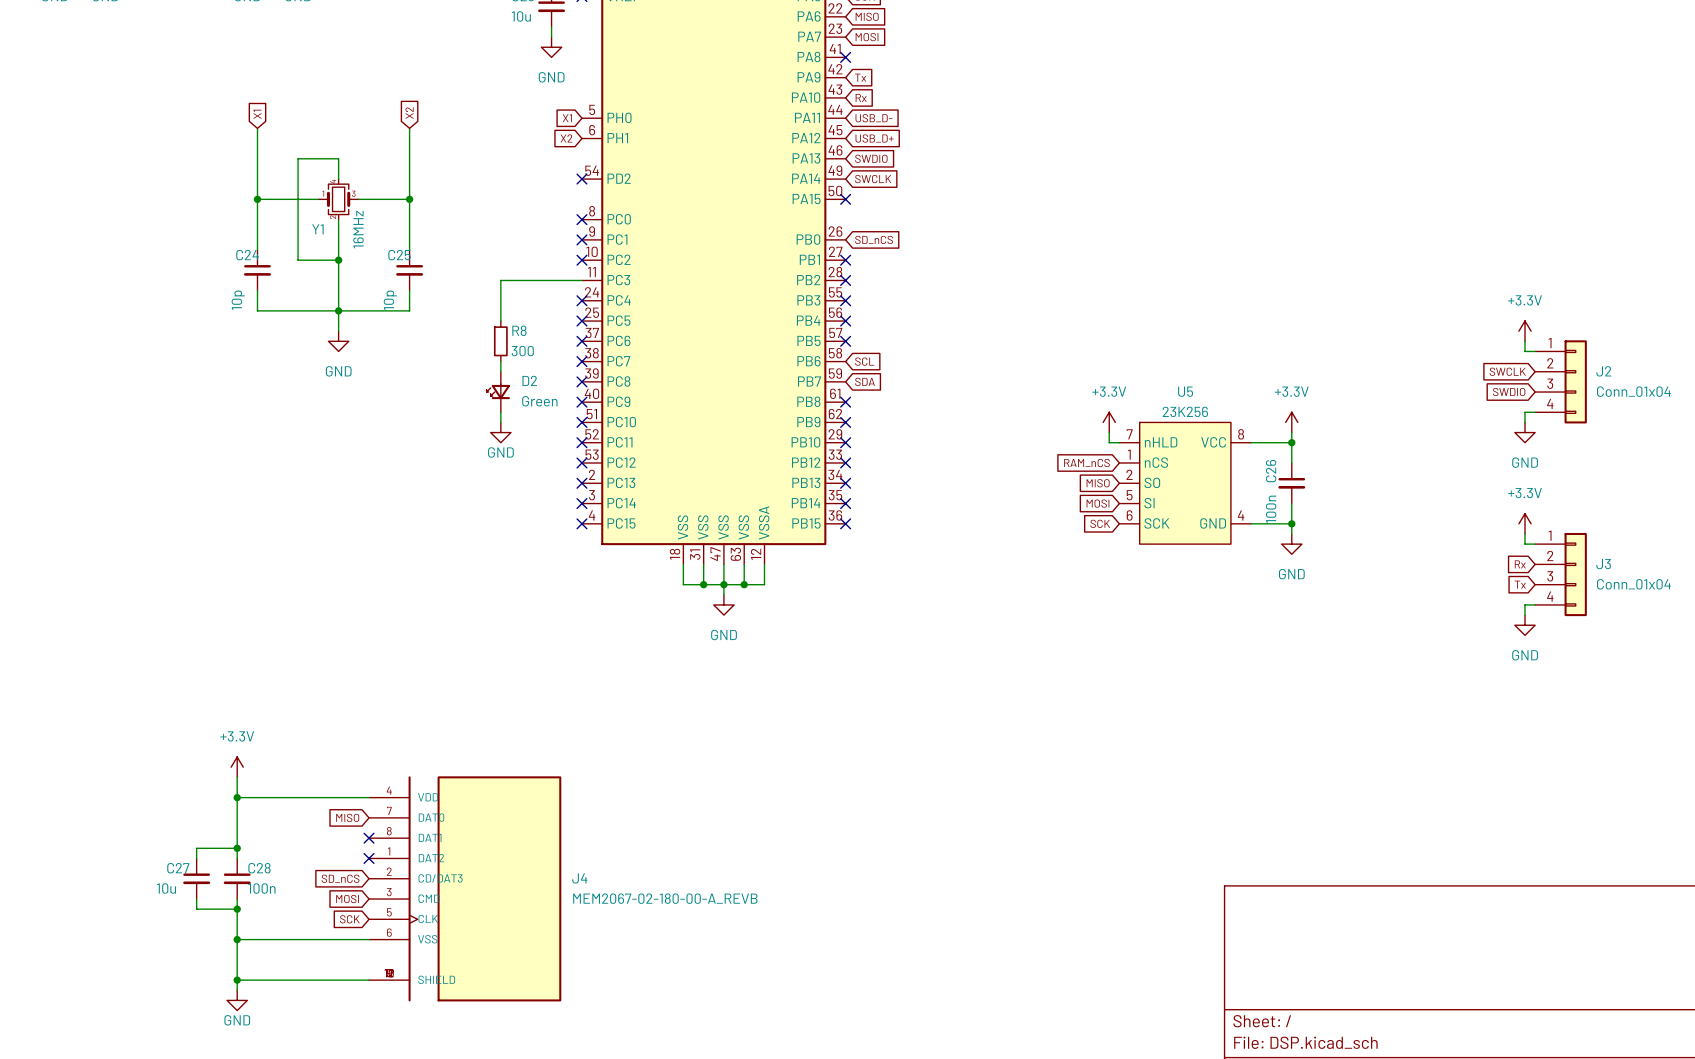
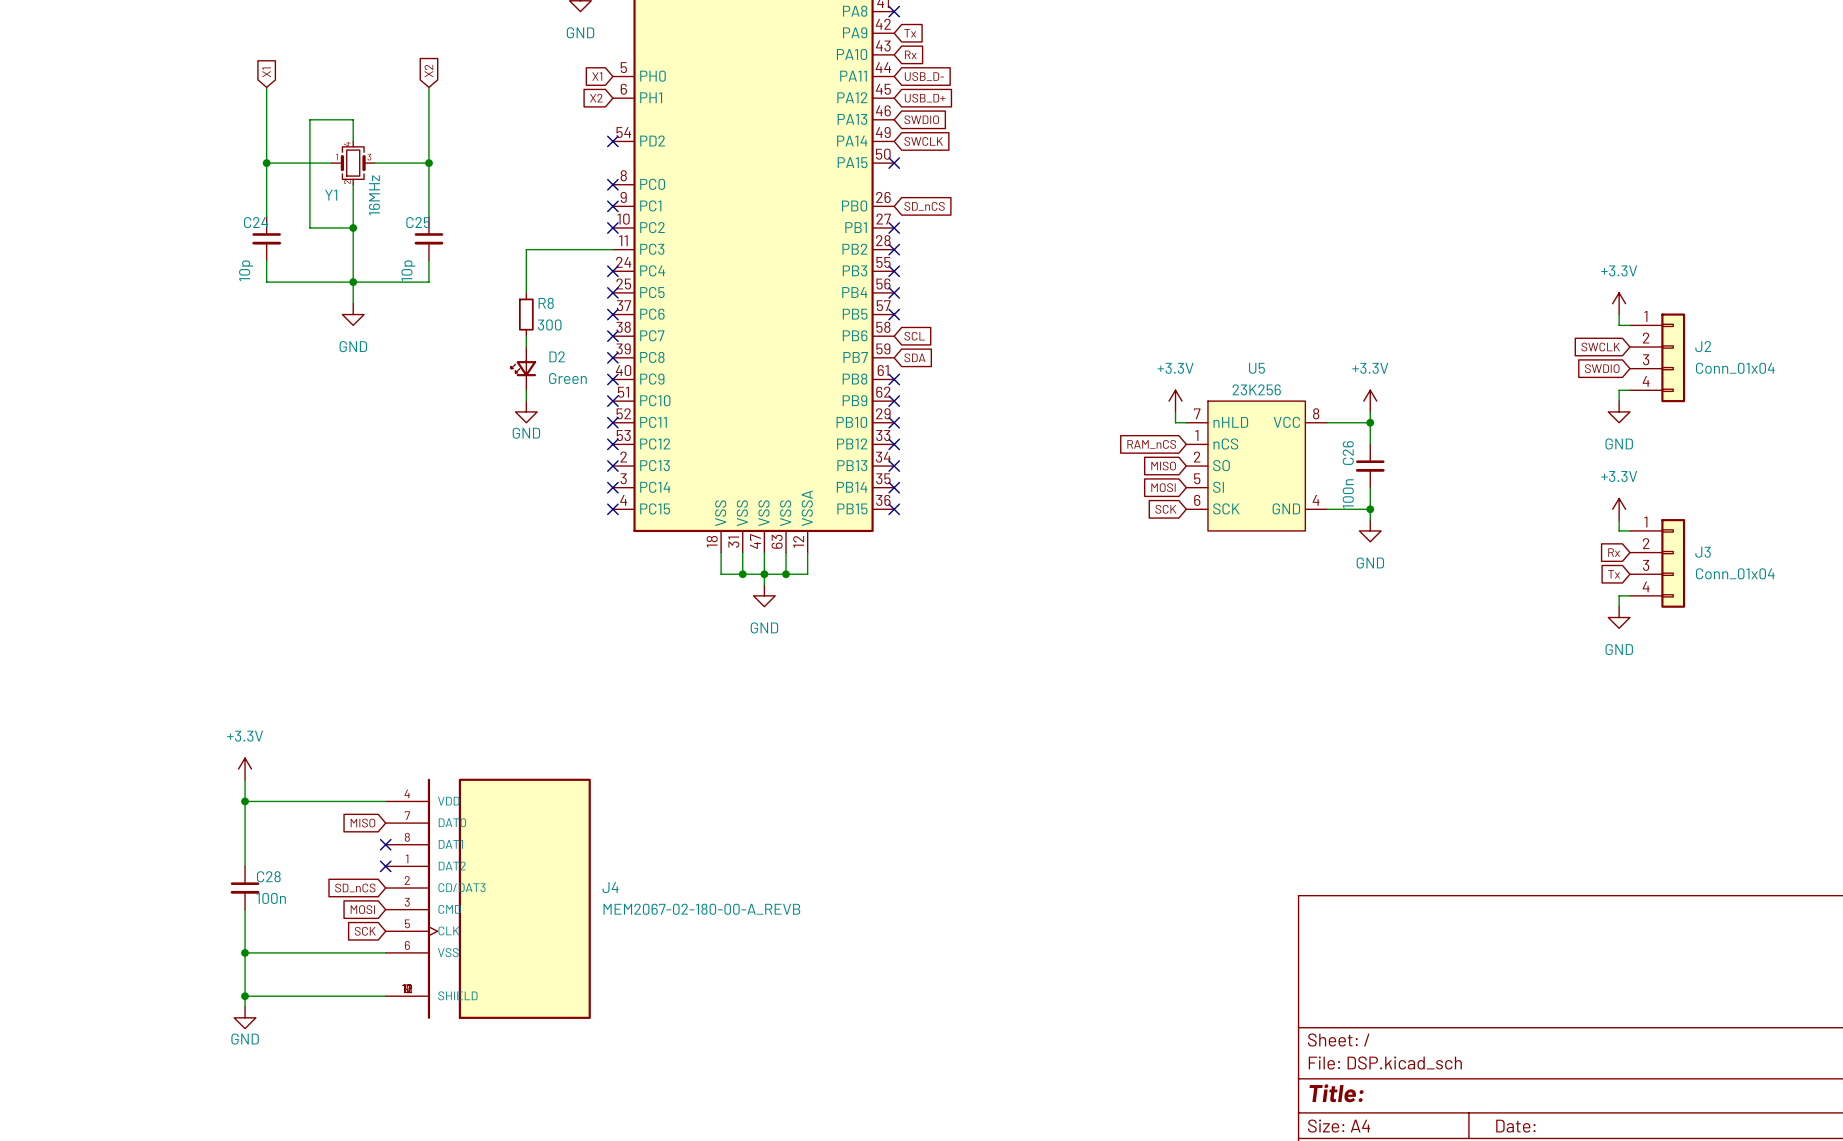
wire: (237, 848) (196, 848) (196, 858) -> none
junction: (237, 848) -> none
C27: 10u (196, 878) -> none
wire: (196, 899) (196, 909) (237, 909) -> none
junction: (237, 909) -> none

